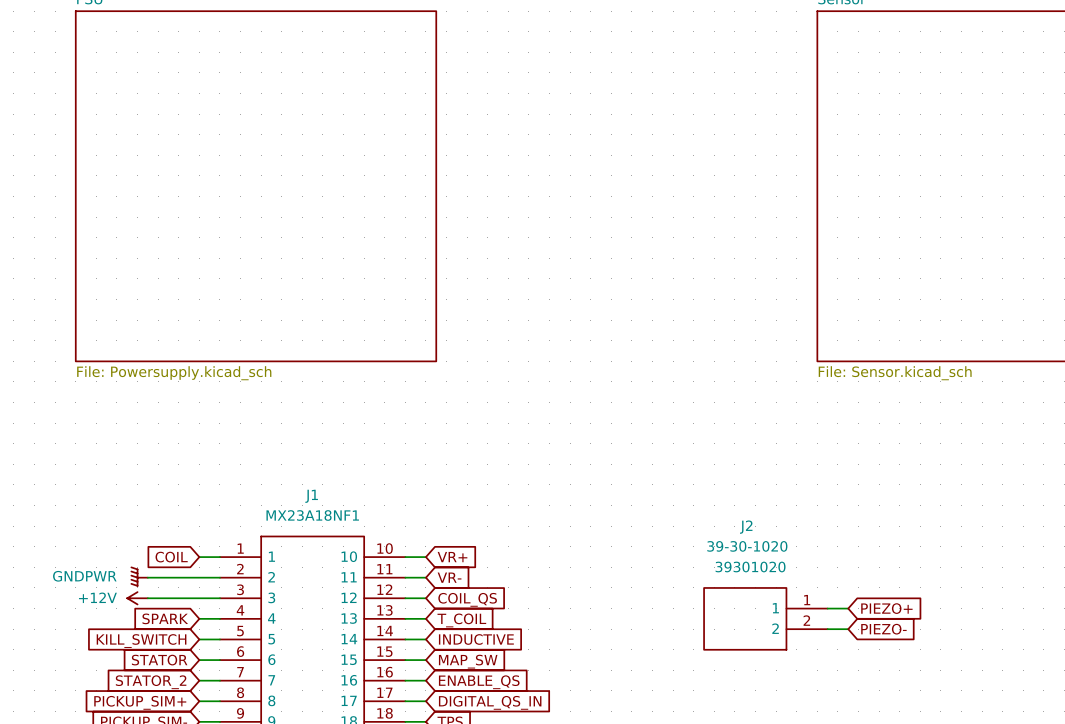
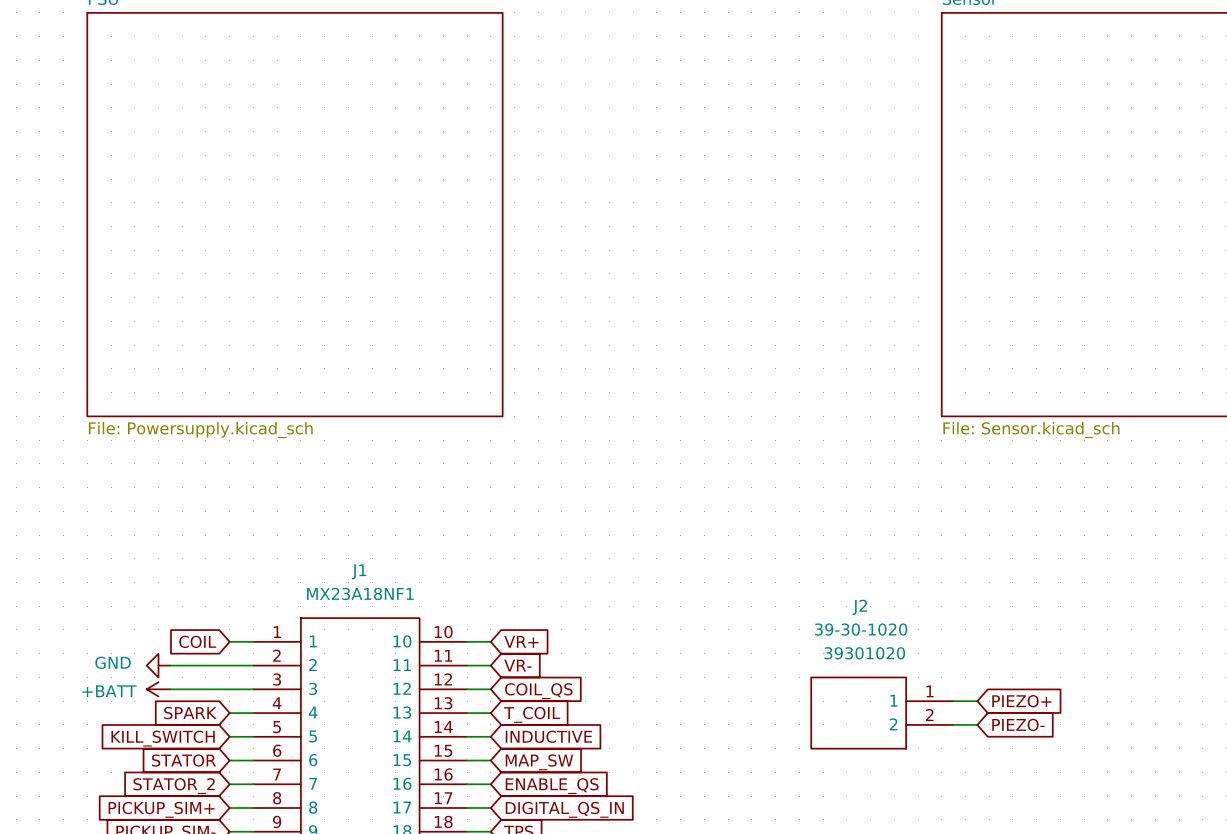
power symbol: GNDPWR (139, 576) -> GND (158, 665)
power symbol: +12V (137, 598) -> +BATT (158, 689)

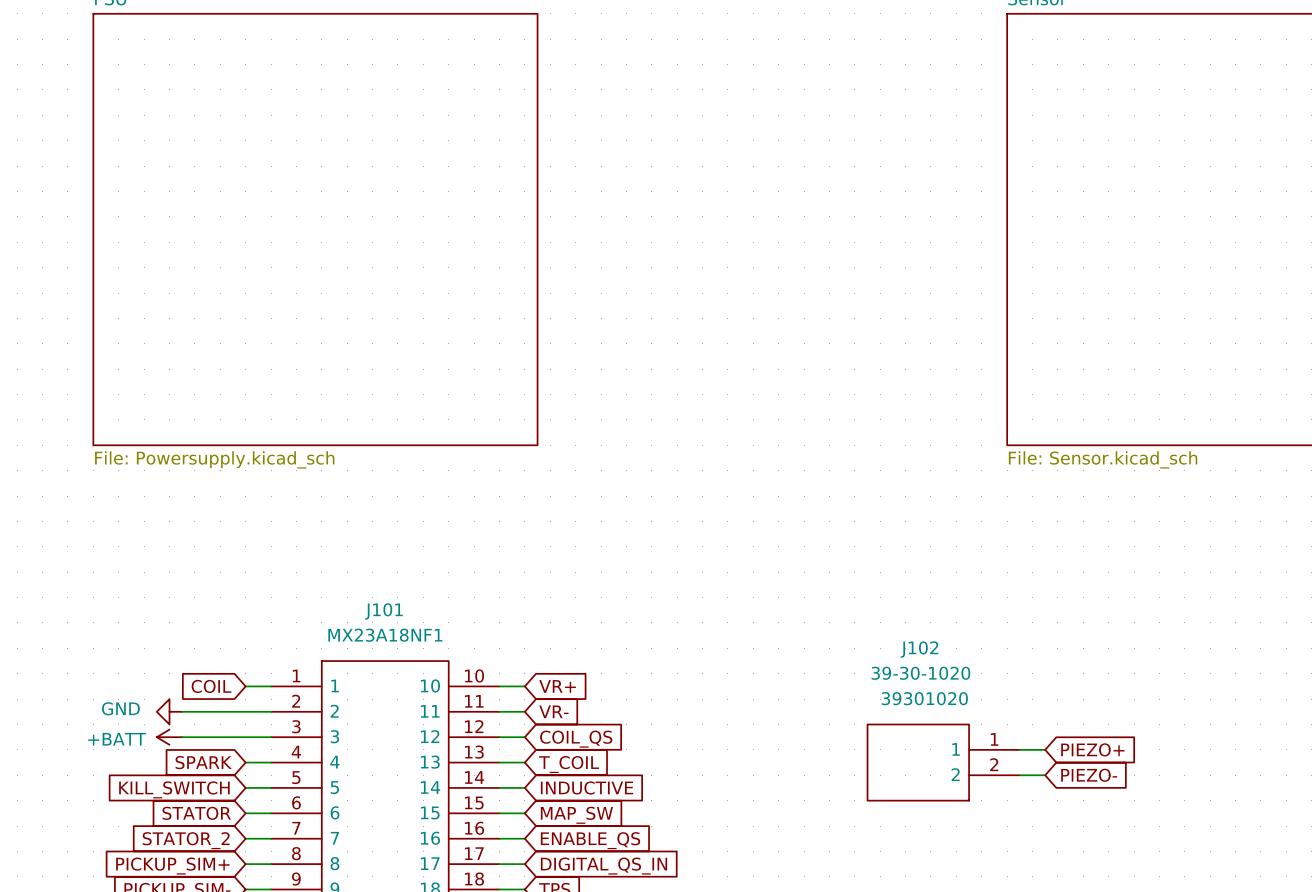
J1 name: J1 (359, 571) -> J101 (384, 611)
J2 name: J2 (859, 607) -> J102 (919, 649)

